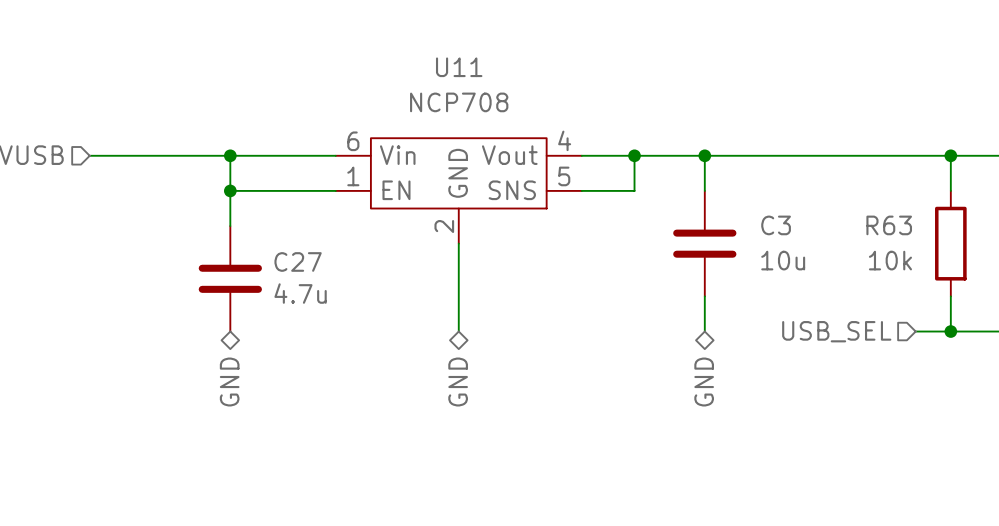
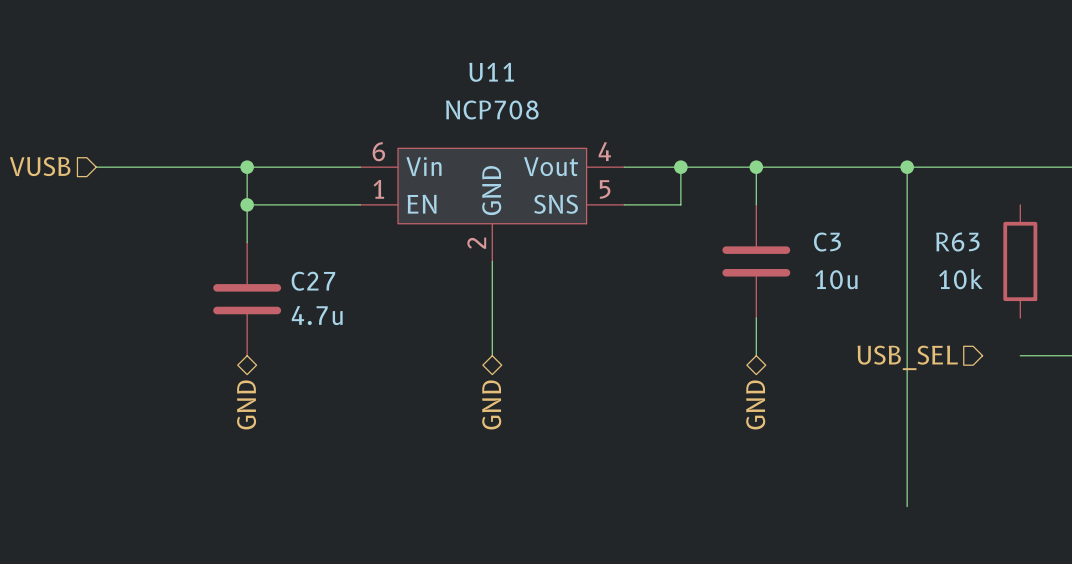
wire: none -> (907, 167) (907, 506)
junction: none -> (907, 167)
wire: (950, 155) (950, 190) -> none
junction: (950, 155) -> none
wire: (950, 296) (950, 331) (915, 331) -> none
junction: (950, 331) -> none

